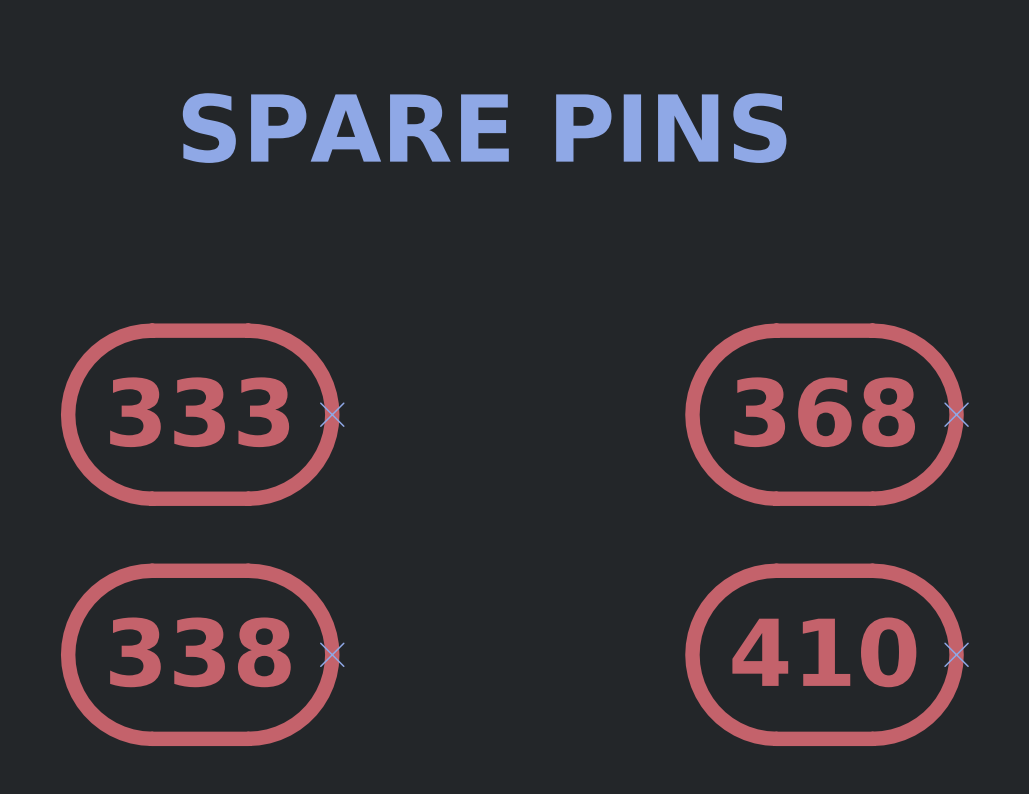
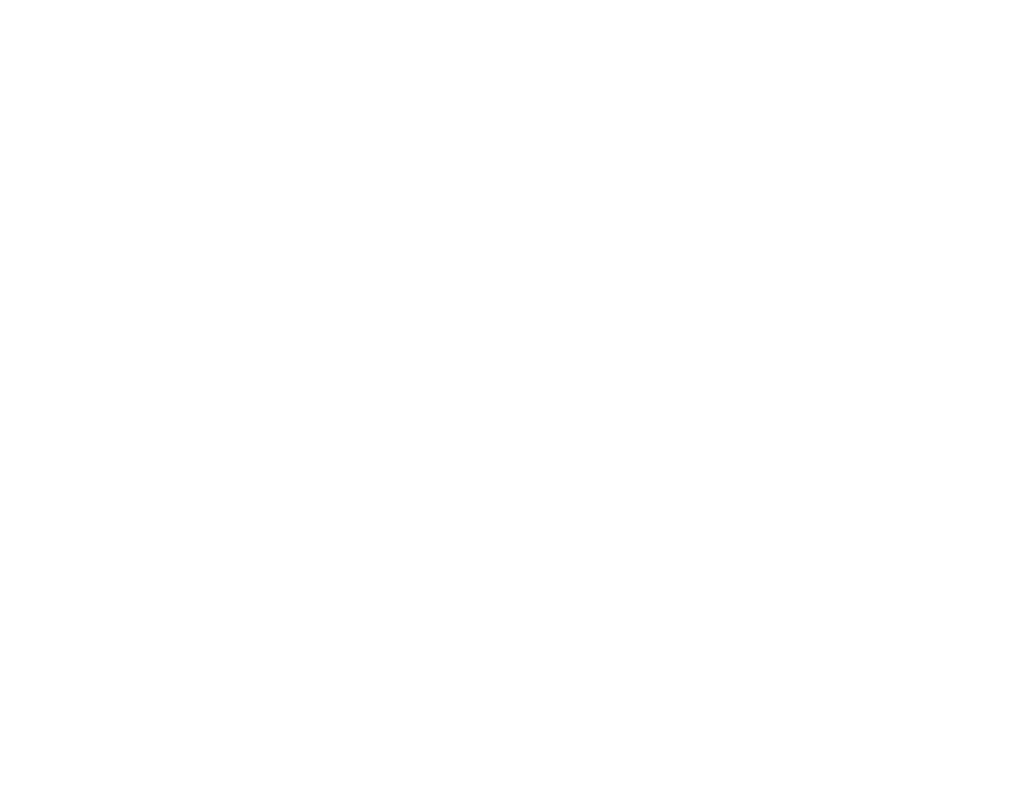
text: SPARE PINS (484, 128) -> none
part: (200, 414) -> none
no-connect mark: (332, 414) -> none
part: (824, 414) -> none
no-connect mark: (956, 414) -> none
part: (200, 654) -> none
no-connect mark: (332, 654) -> none
part: (824, 654) -> none
no-connect mark: (956, 654) -> none

